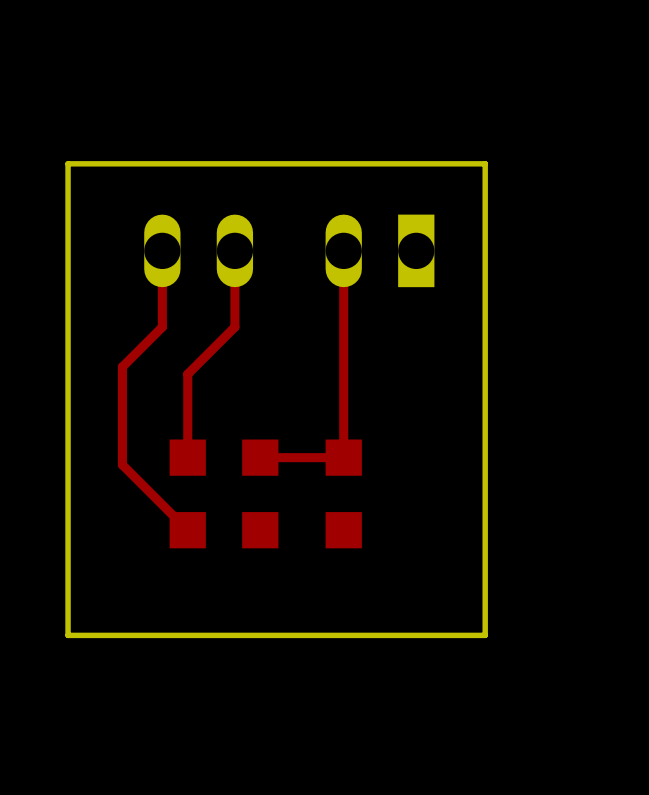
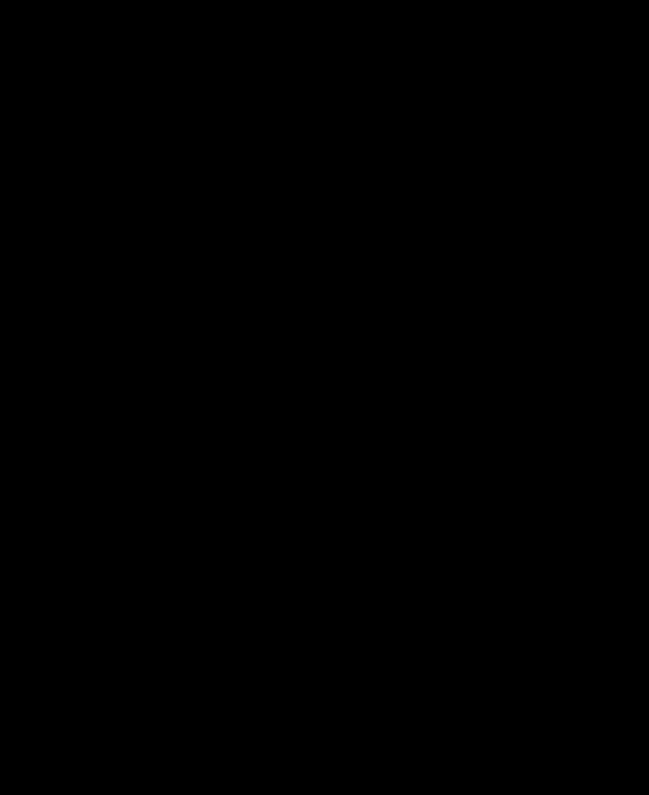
board edge: (485, 163) (68, 163) (68, 635) (485, 635) (485, 163) -> none
top track: (162, 250) (162, 327) (122, 366) (122, 464) (187, 530) -> none
top track: (234, 250) (234, 327) (187, 374) (187, 457) -> none
part: (289, 250) -> none
top track: (343, 250) (343, 457) (260, 457) -> none
part: (224, 493) -> none
part: (343, 493) -> none

